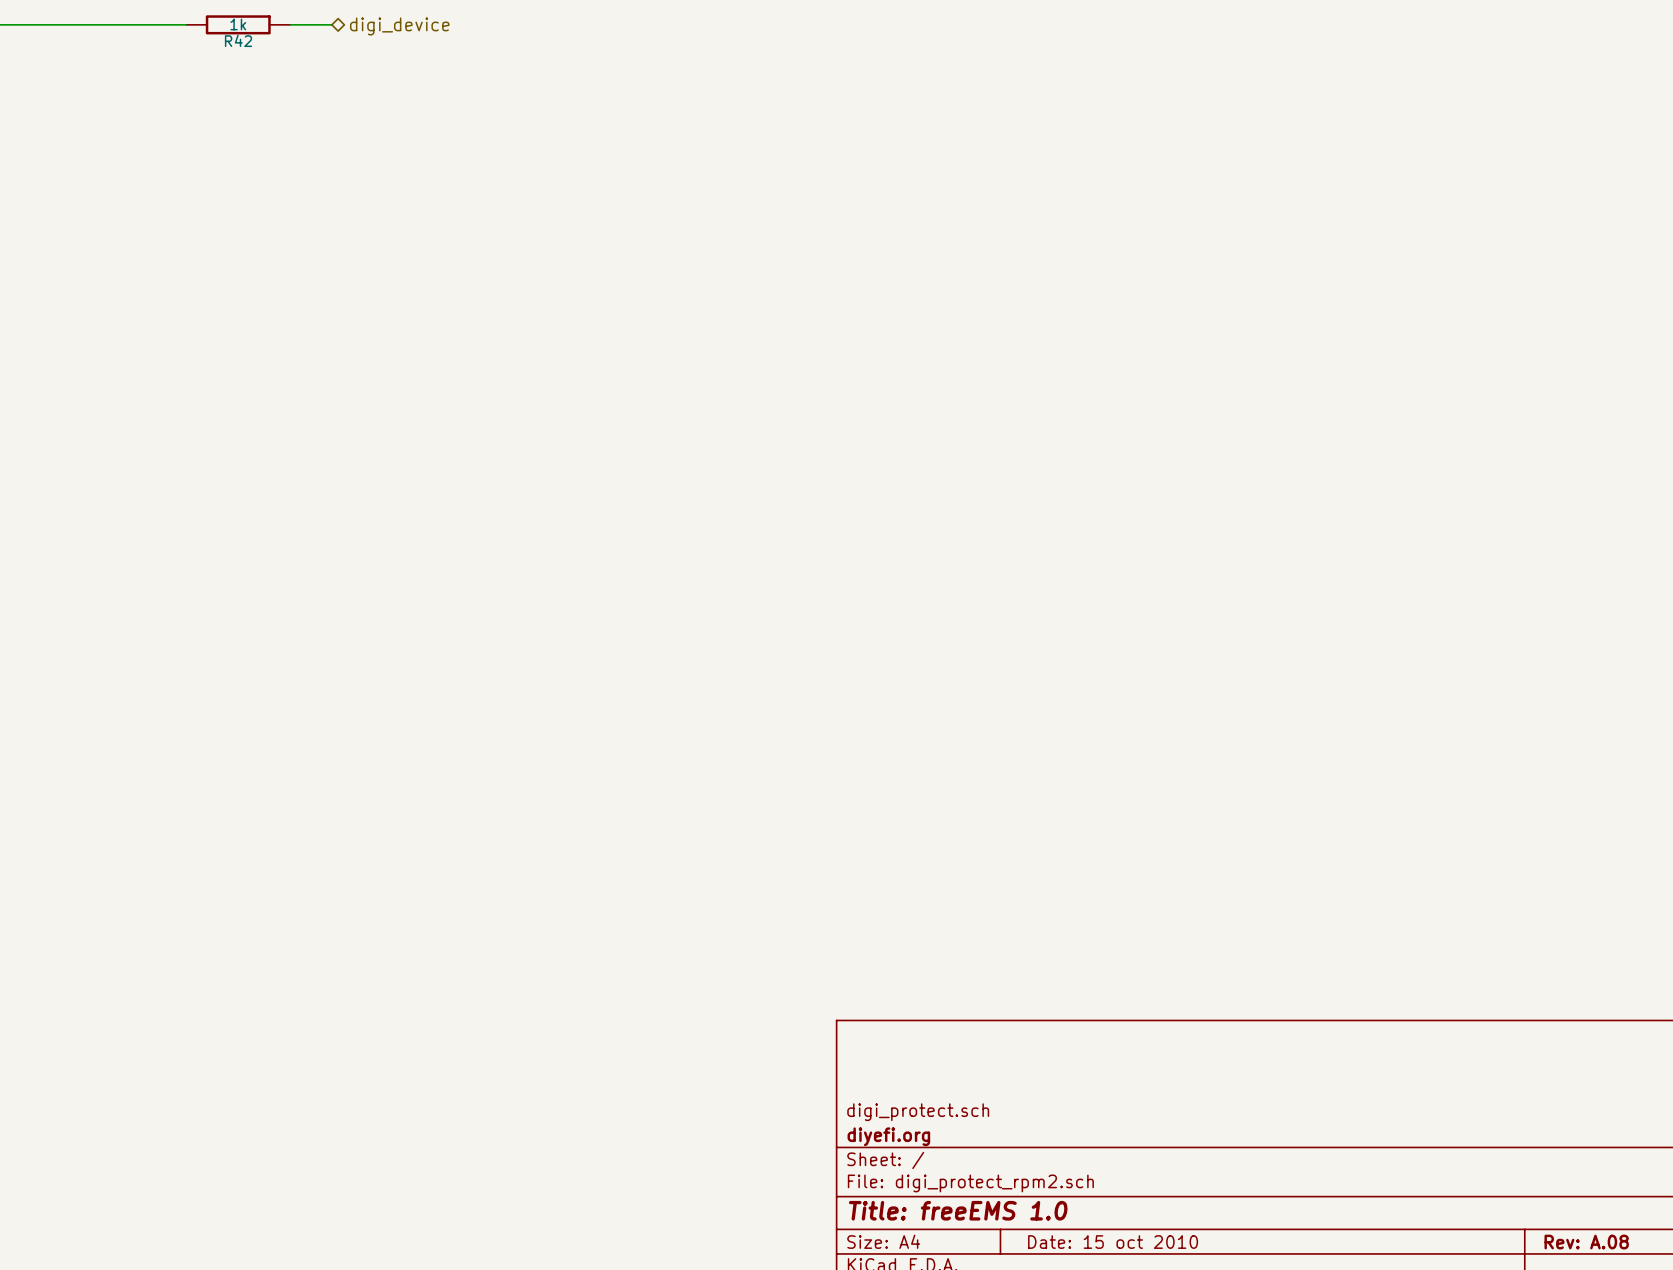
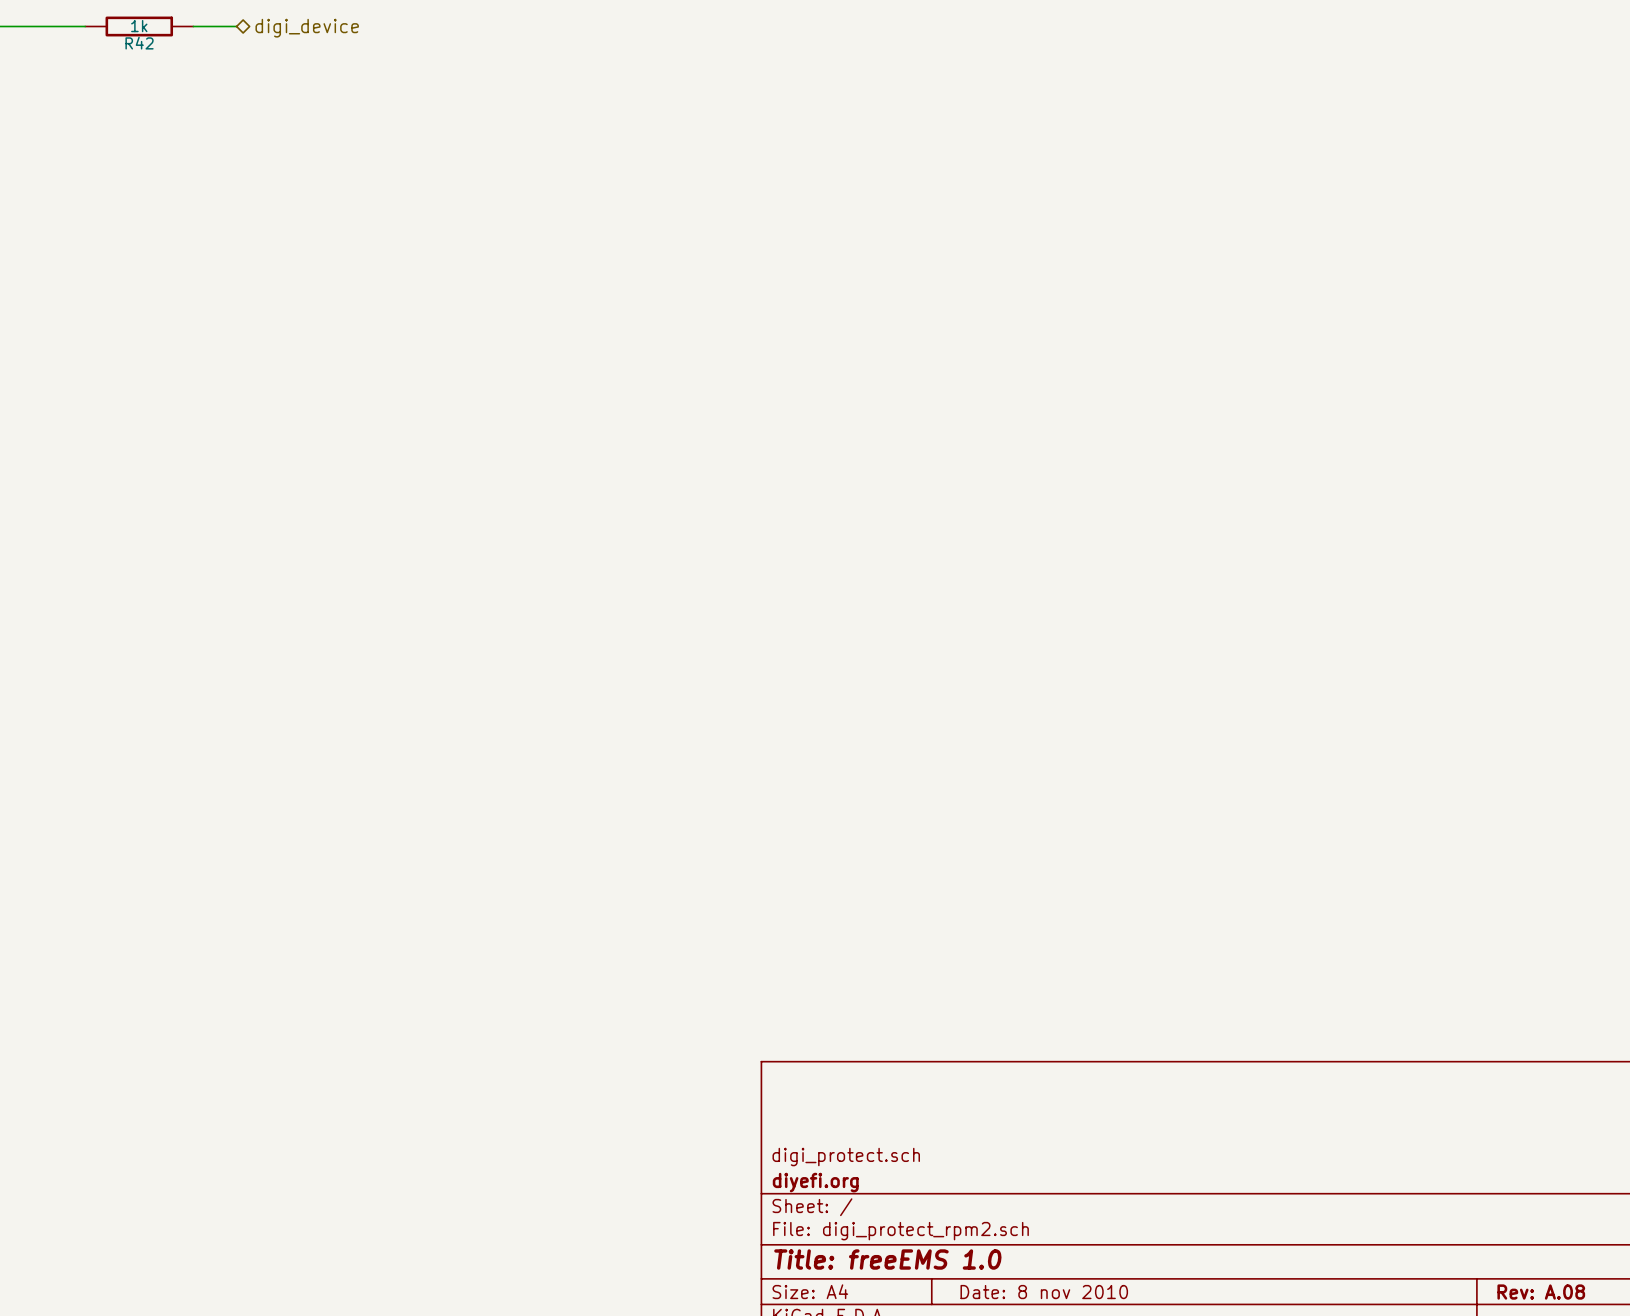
title block: Date: 15 oct 2010 (1113, 1242) -> Date: 8 nov 2010 (1044, 1292)

